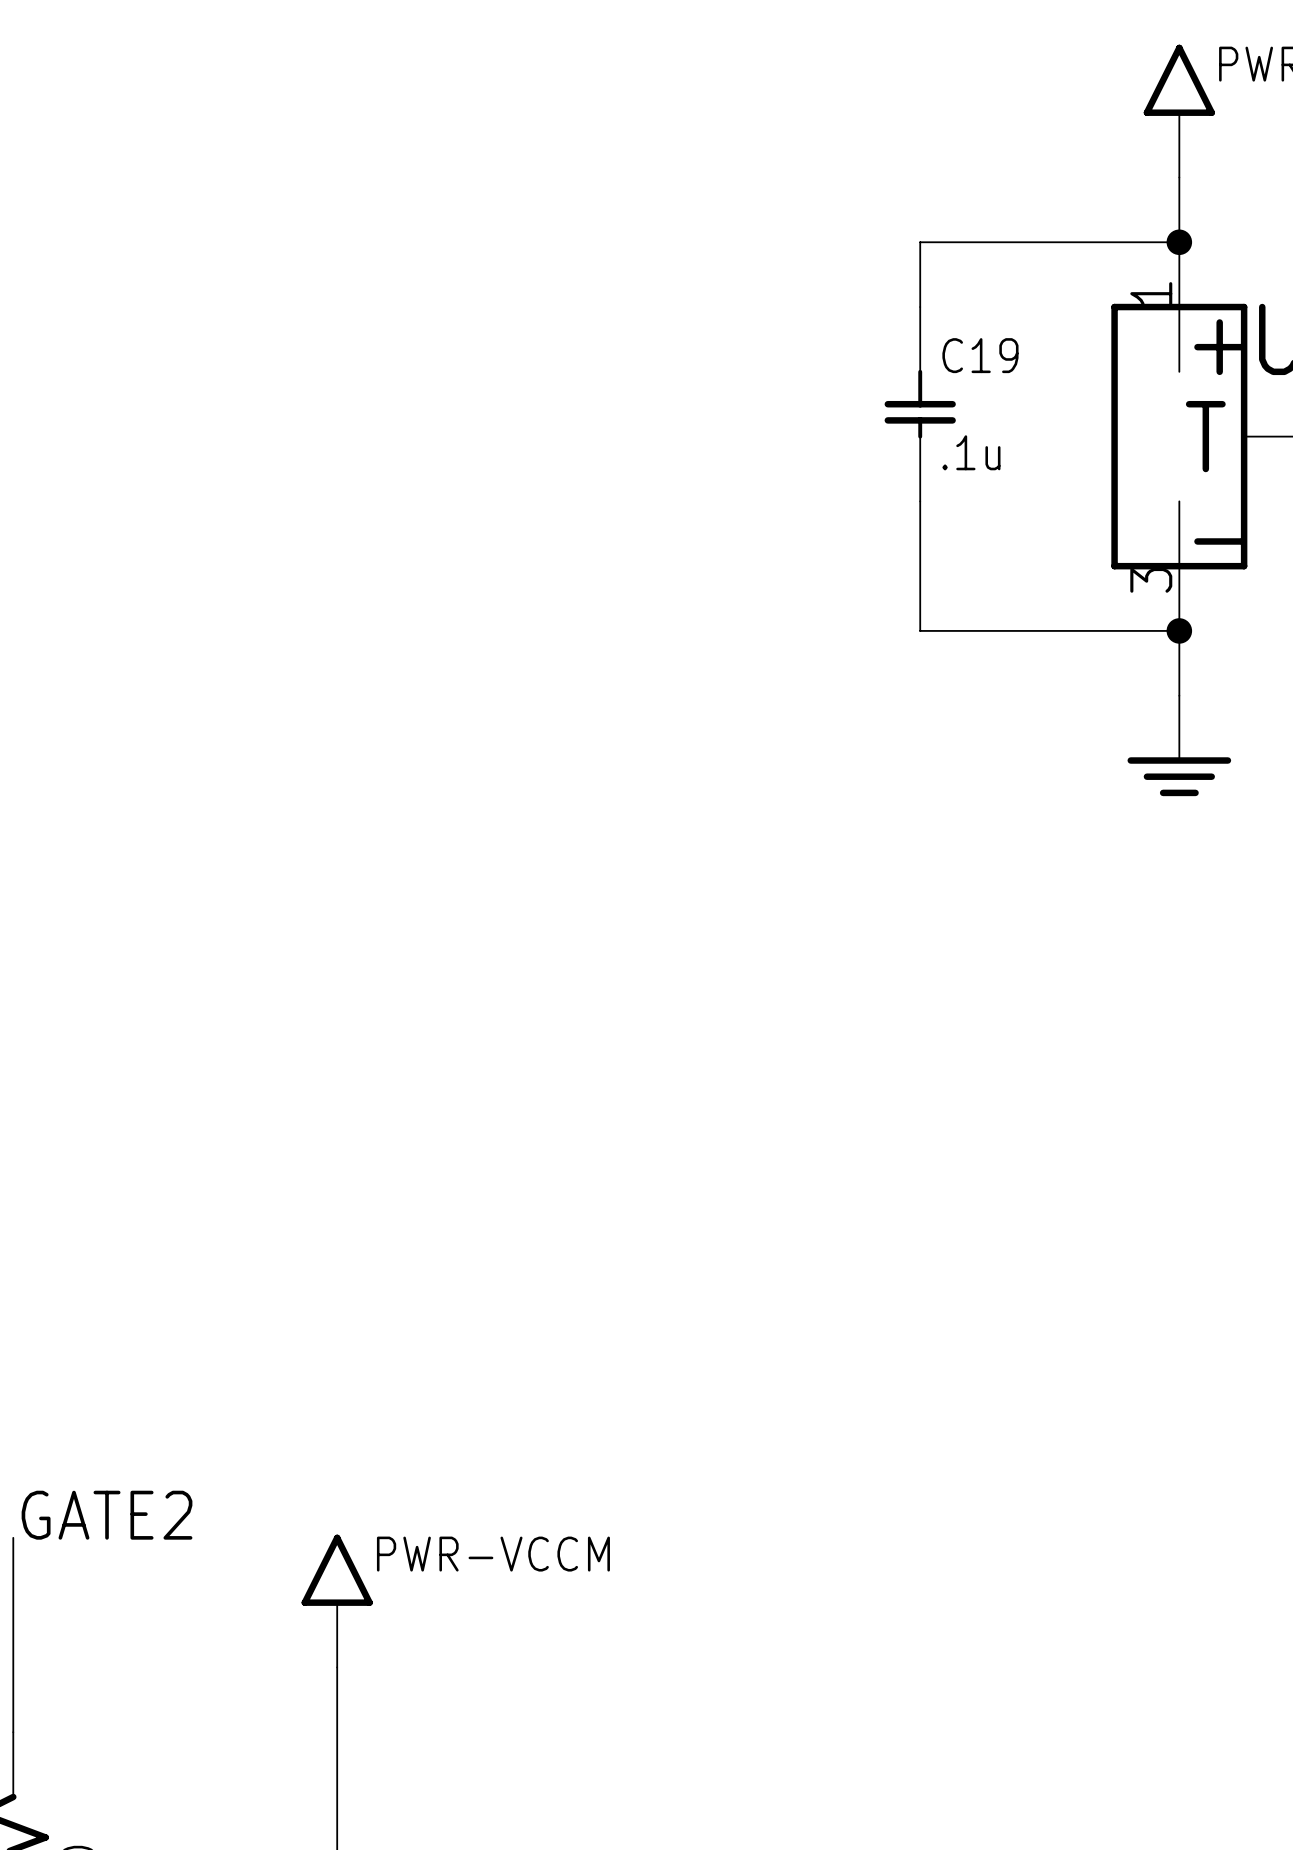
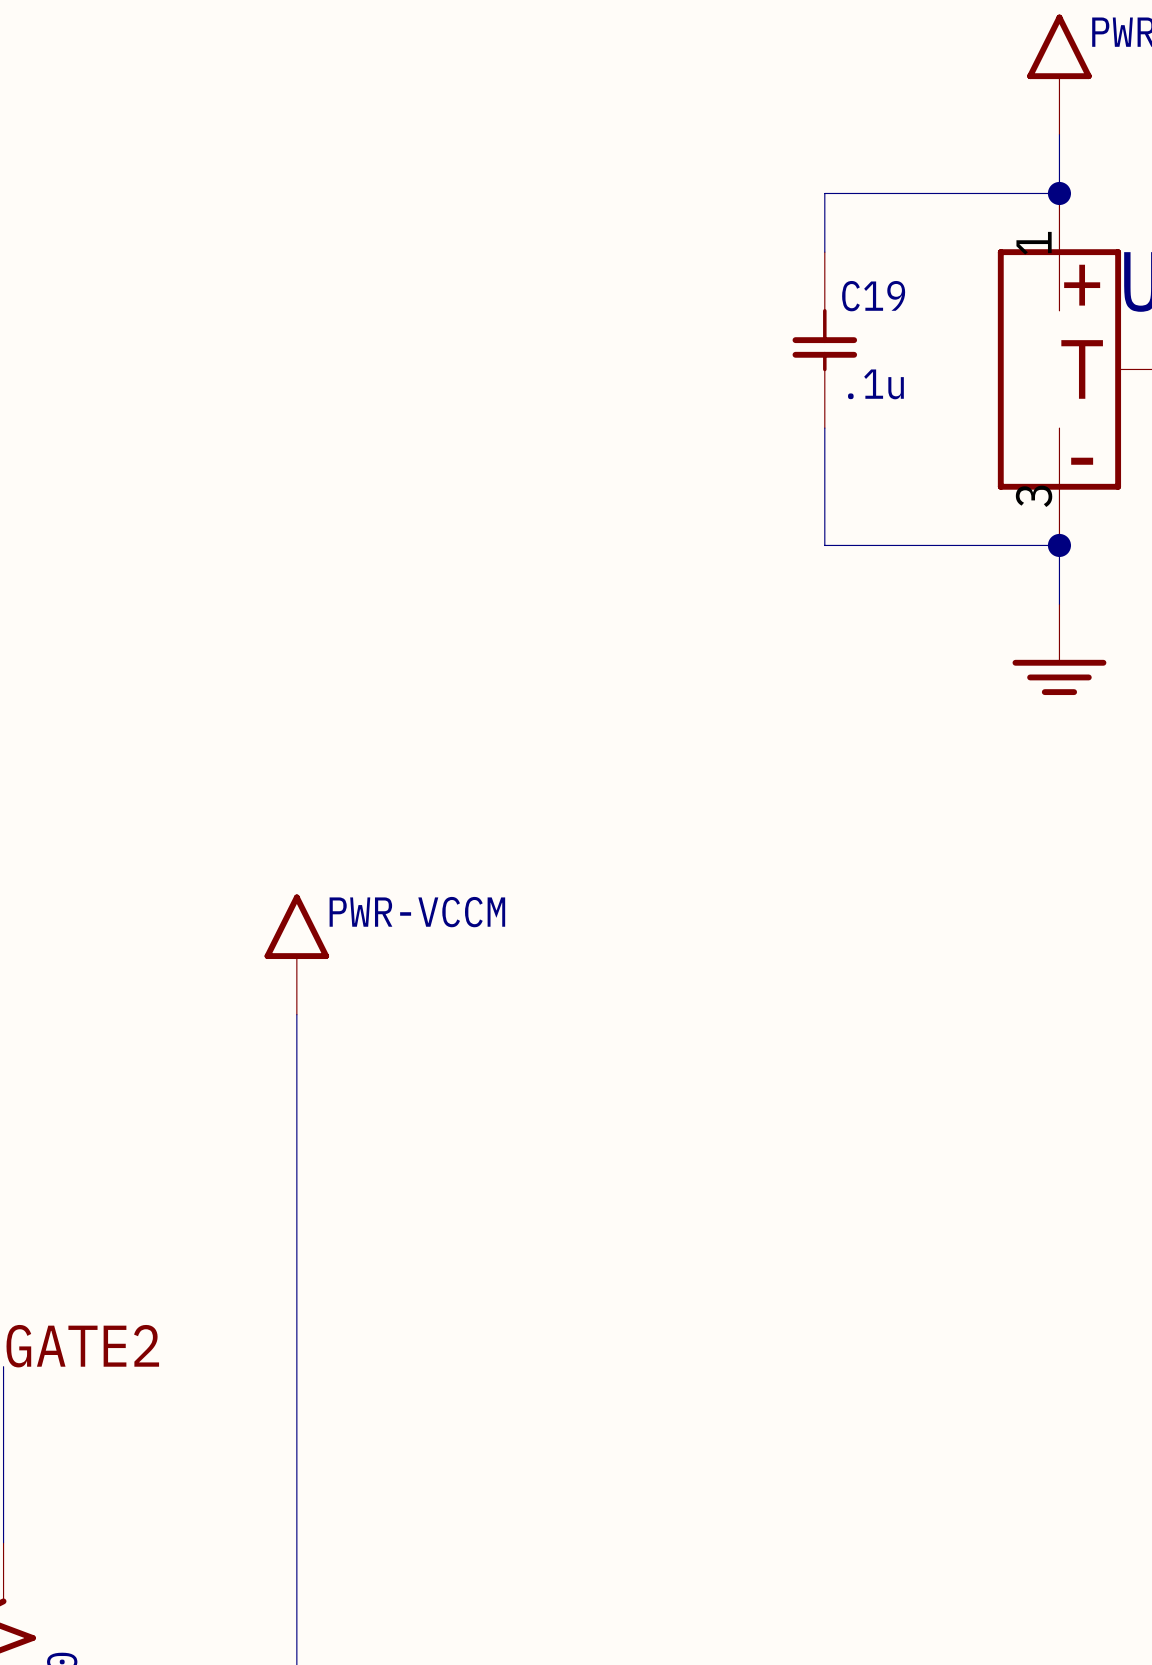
power symbol: none -> PWR-VCCM (296, 954)
wire: none -> (296, 1014) (296, 1484)
power symbol: PWR-VCCM (337, 1601) -> none

